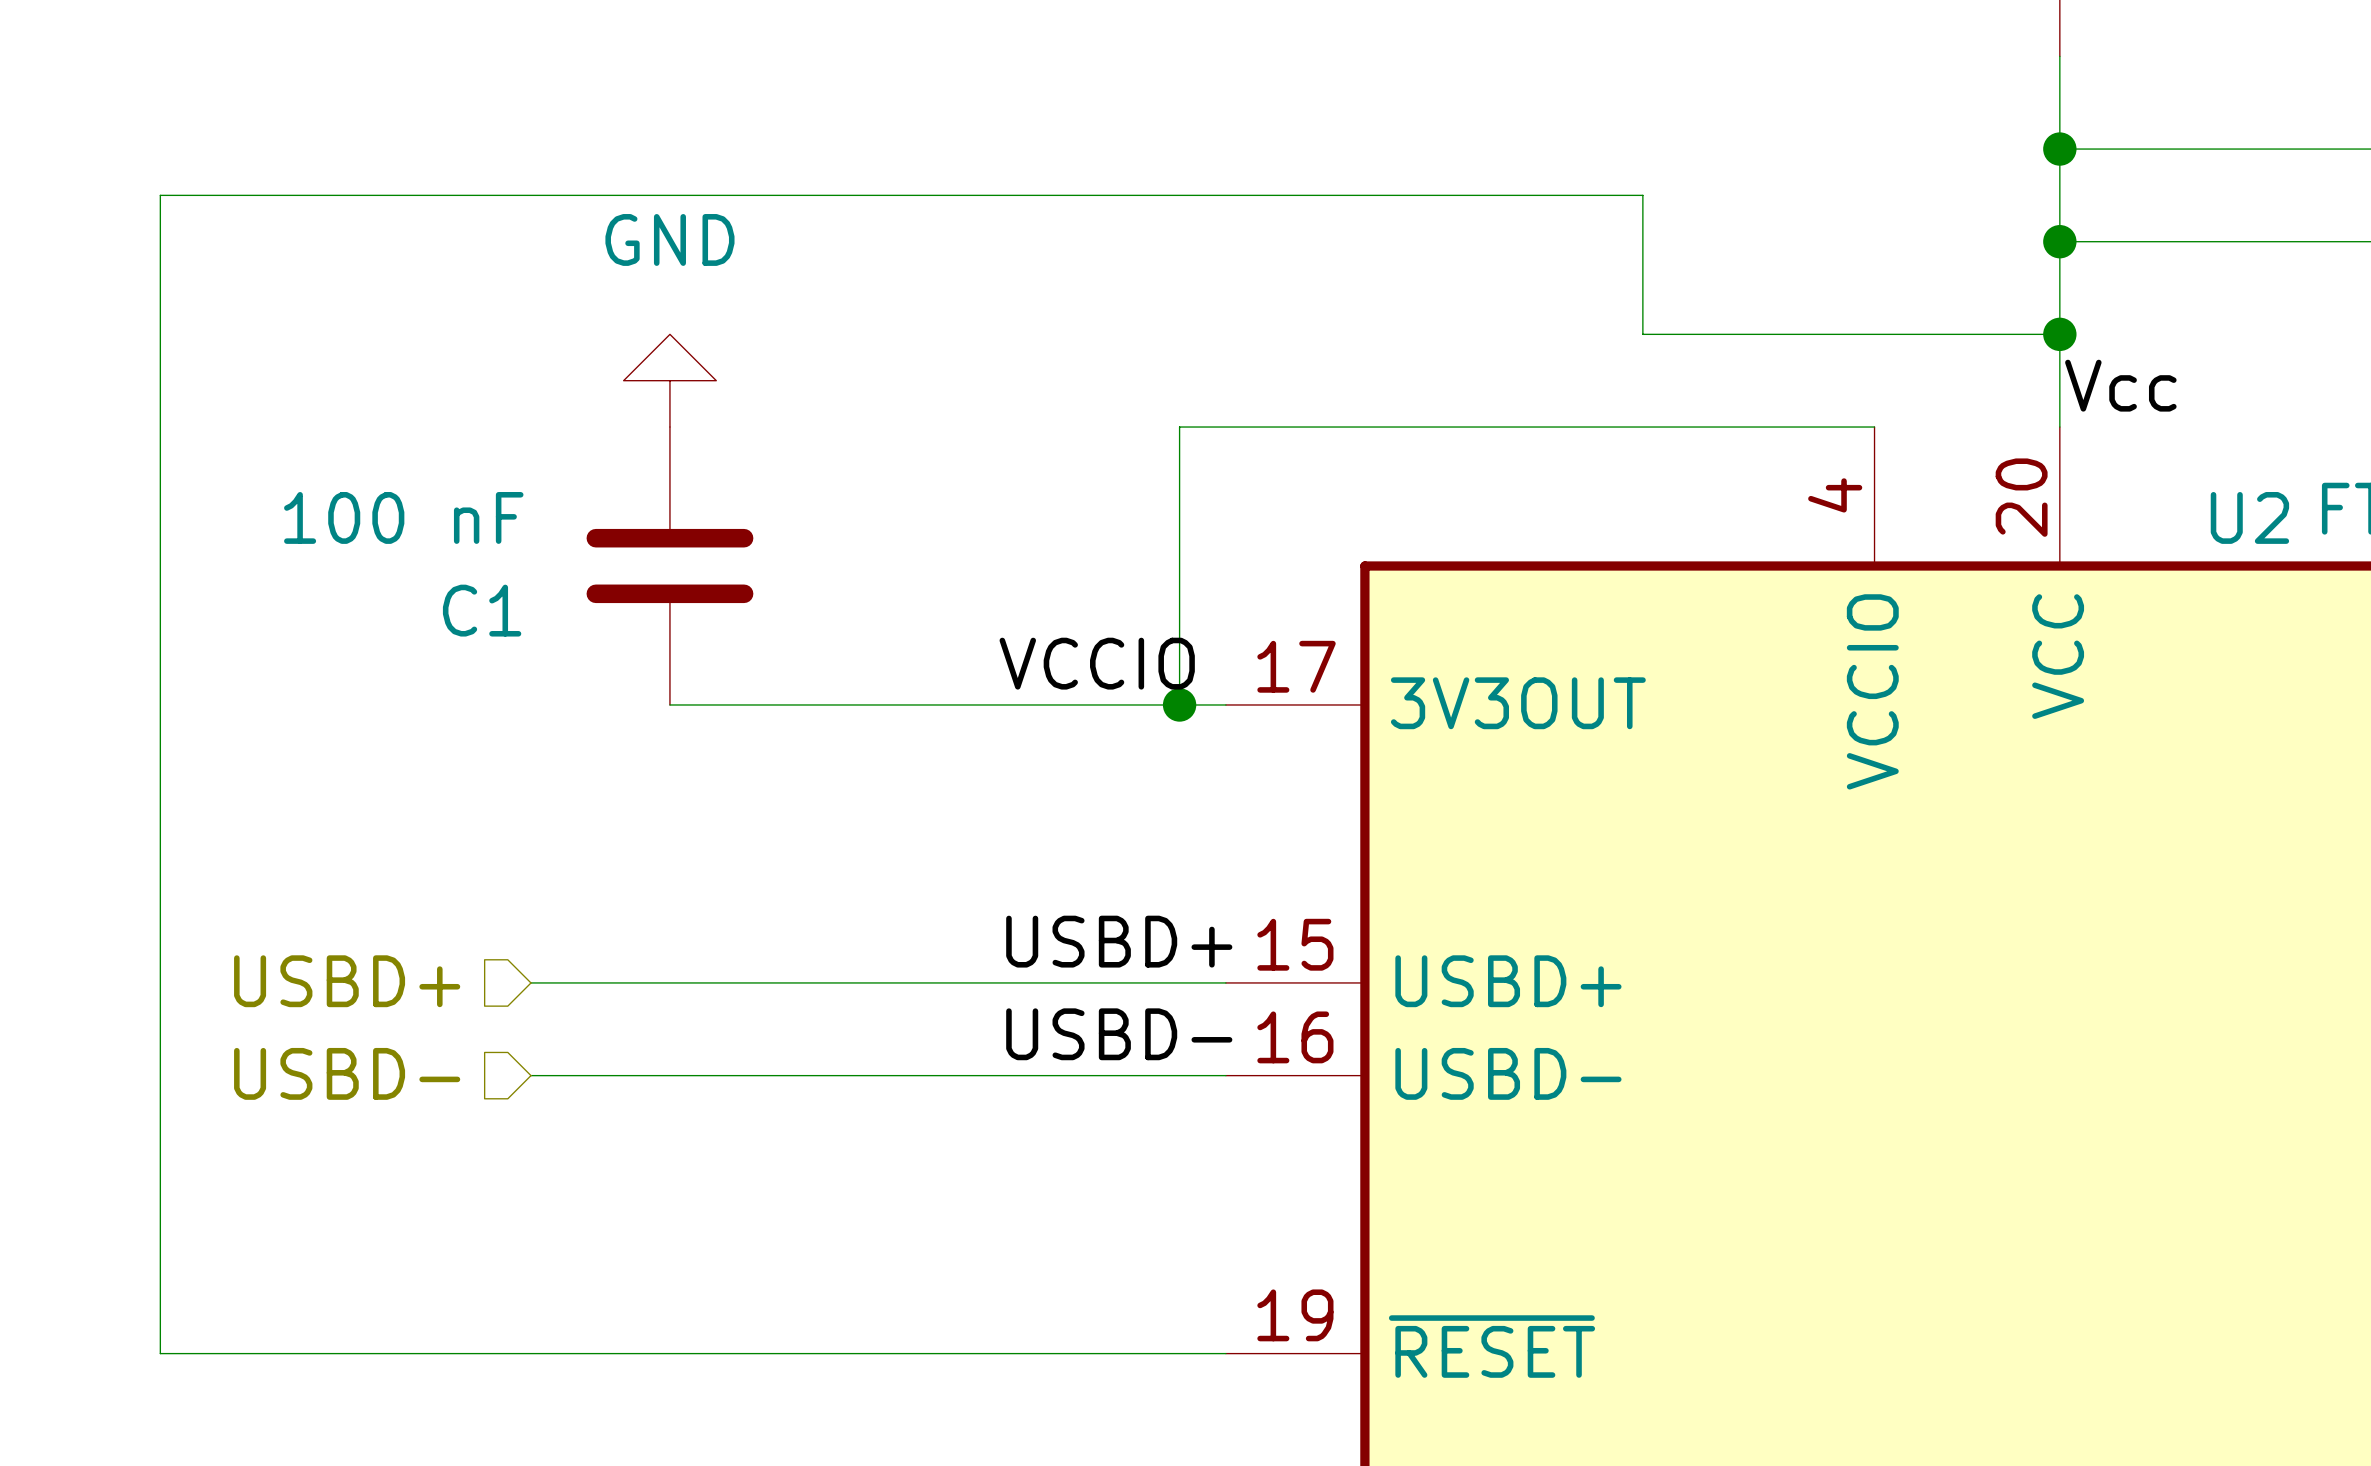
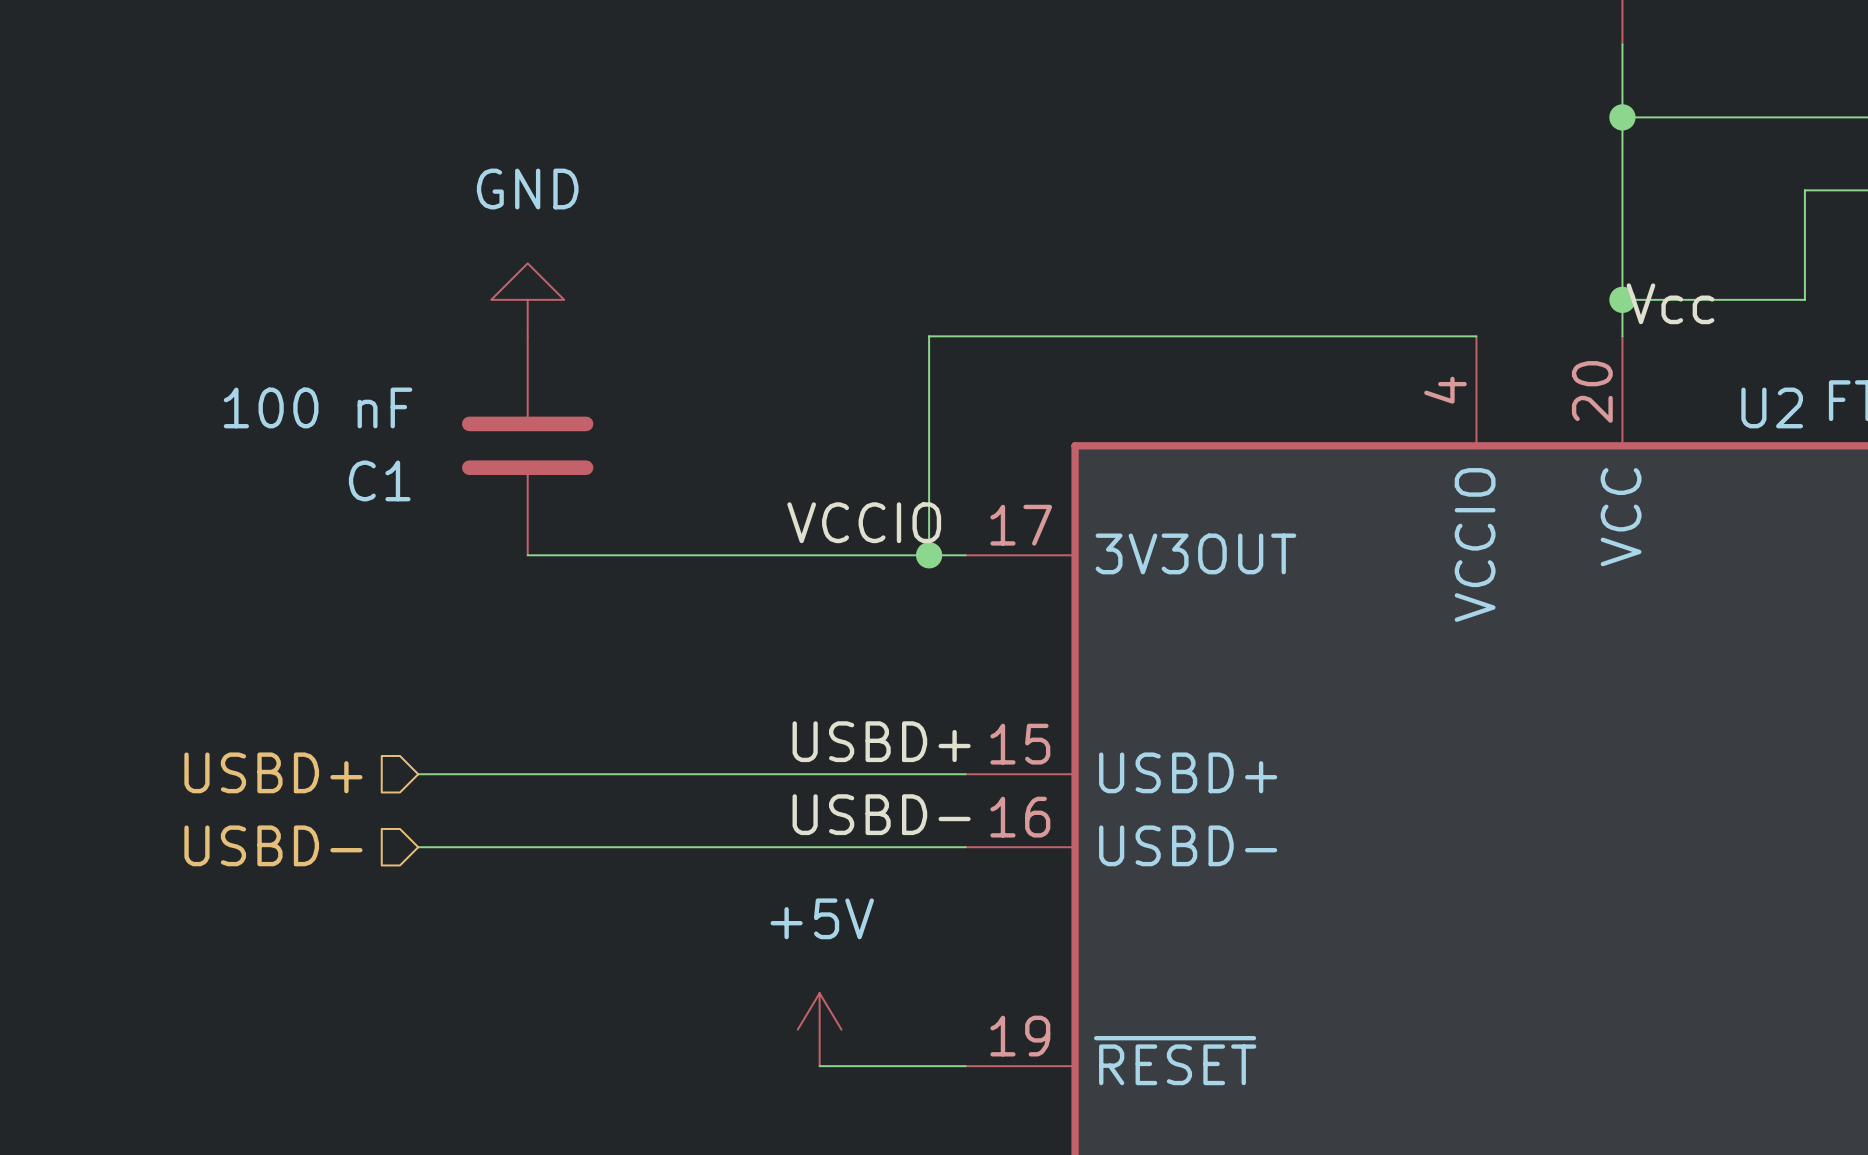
wire: (2059, 241) (2291, 241) -> (1622, 299) (1804, 299) (1804, 190)
junction: (2059, 241) -> none
wire: (2059, 334) (1642, 334) (1642, 195) (160, 195) (160, 1353) (1040, 1353) -> none
junction position: (2059, 334) -> (1622, 299)
power symbol: none -> +5V (819, 1029)

